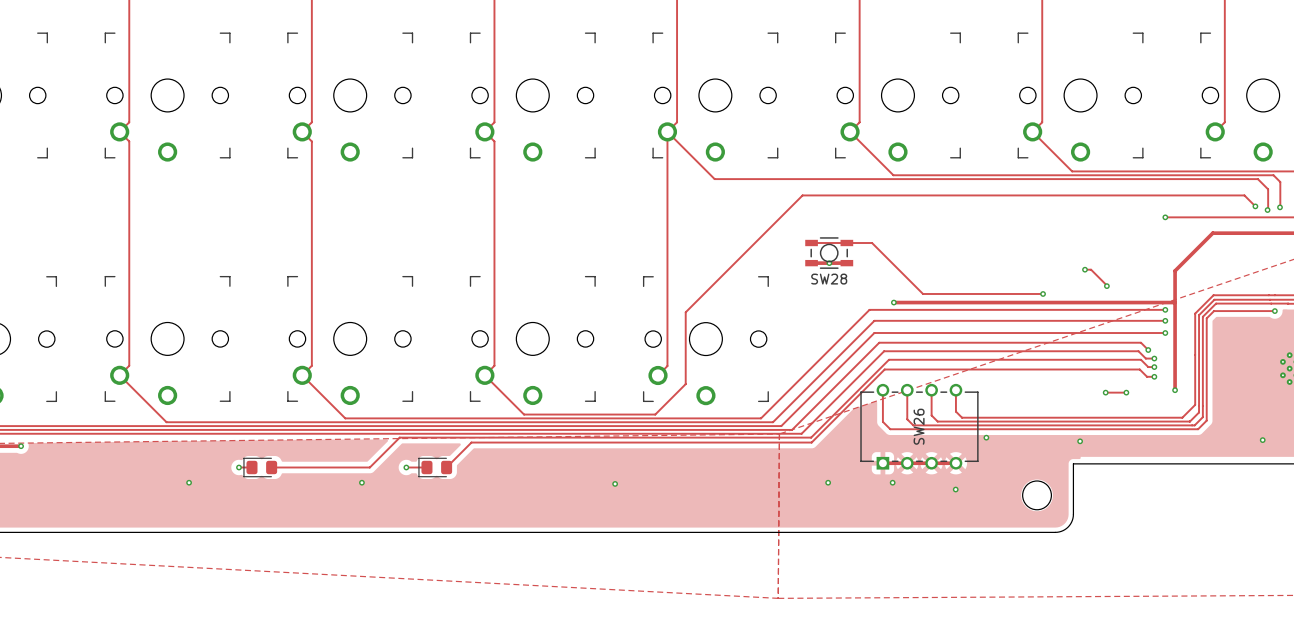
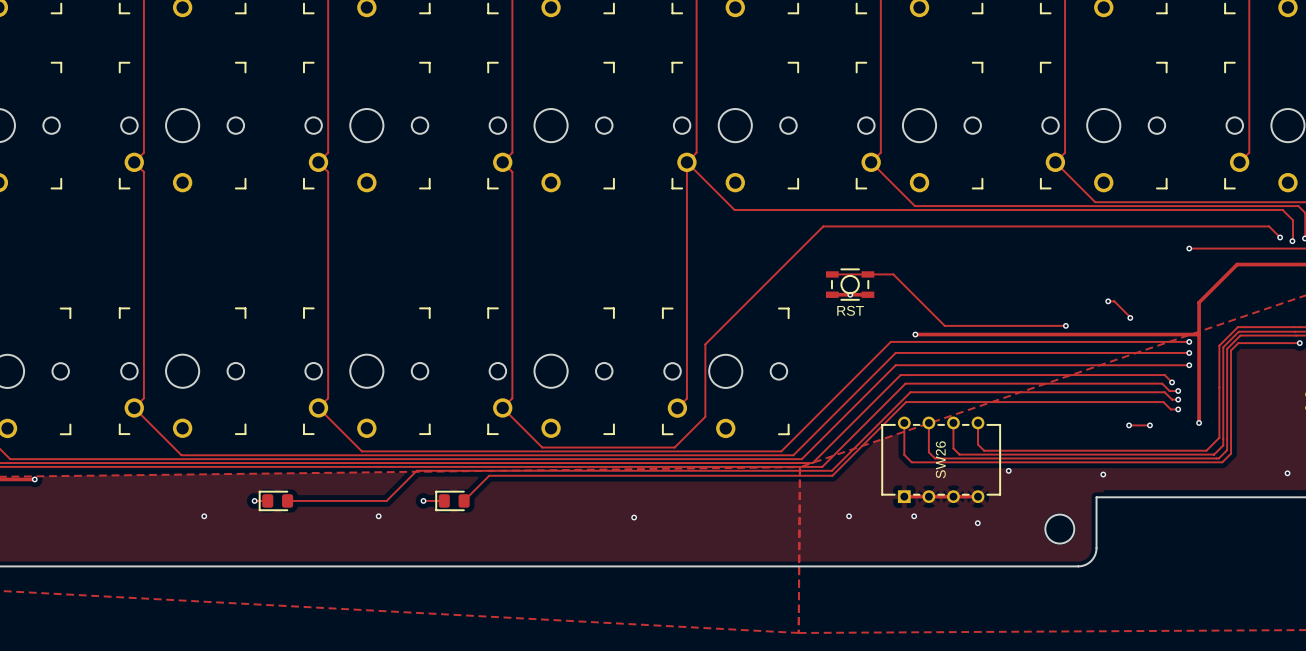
SW28 name: SW28 (829, 279) -> RST (850, 310)

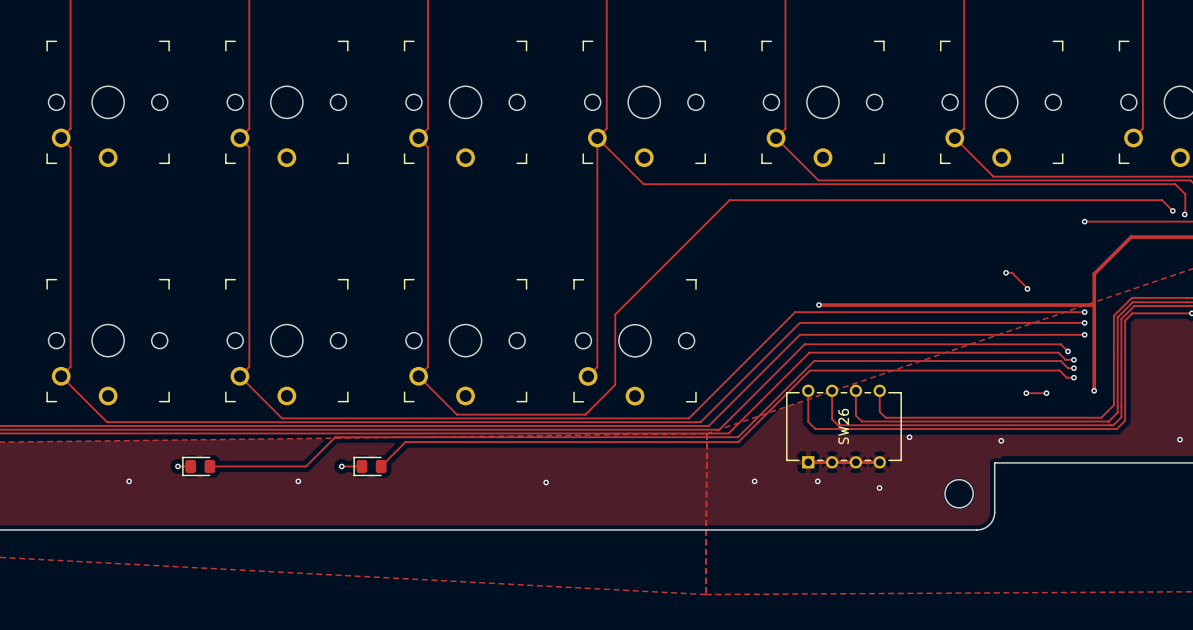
track: (832, 274) (893, 274) (944, 325) (1065, 325) -> none
RST: (850, 284) -> none
track: (832, 294) (867, 294) -> none
via: (850, 294) -> none
via: (1065, 325) -> none

